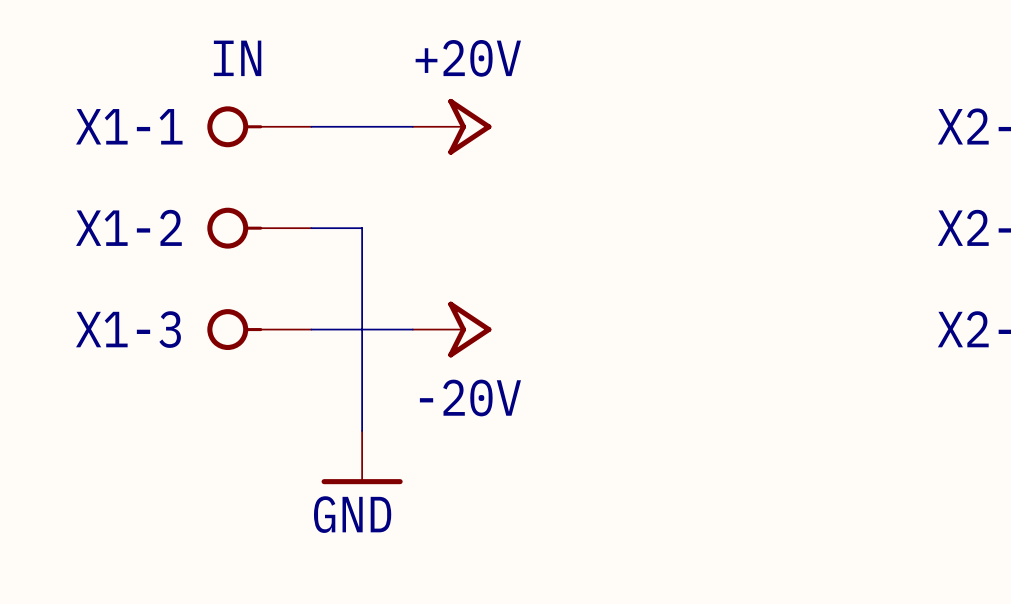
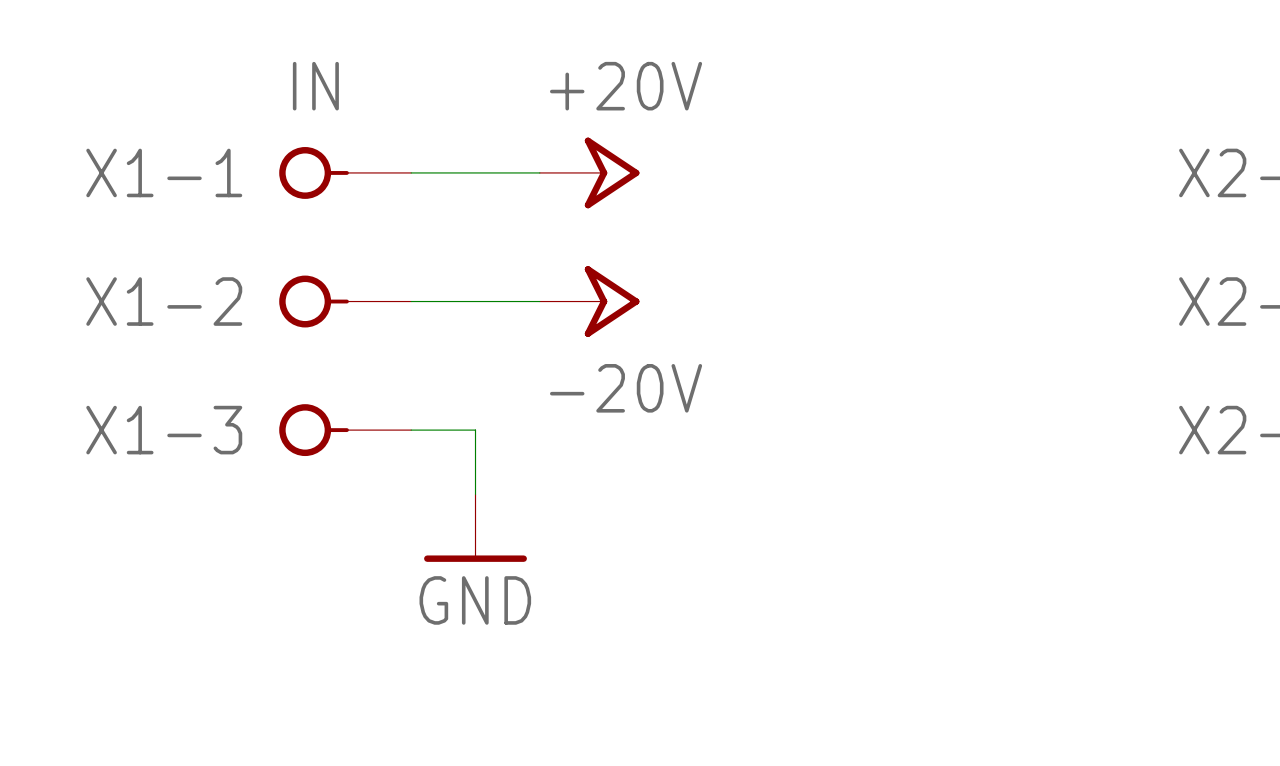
wire: (362, 228) (362, 329) (412, 329) -> (475, 301) (539, 301)
power symbol position: -20V (452, 329) -> -20V (589, 301)
power symbol position: GND (362, 457) -> GND (475, 528)

